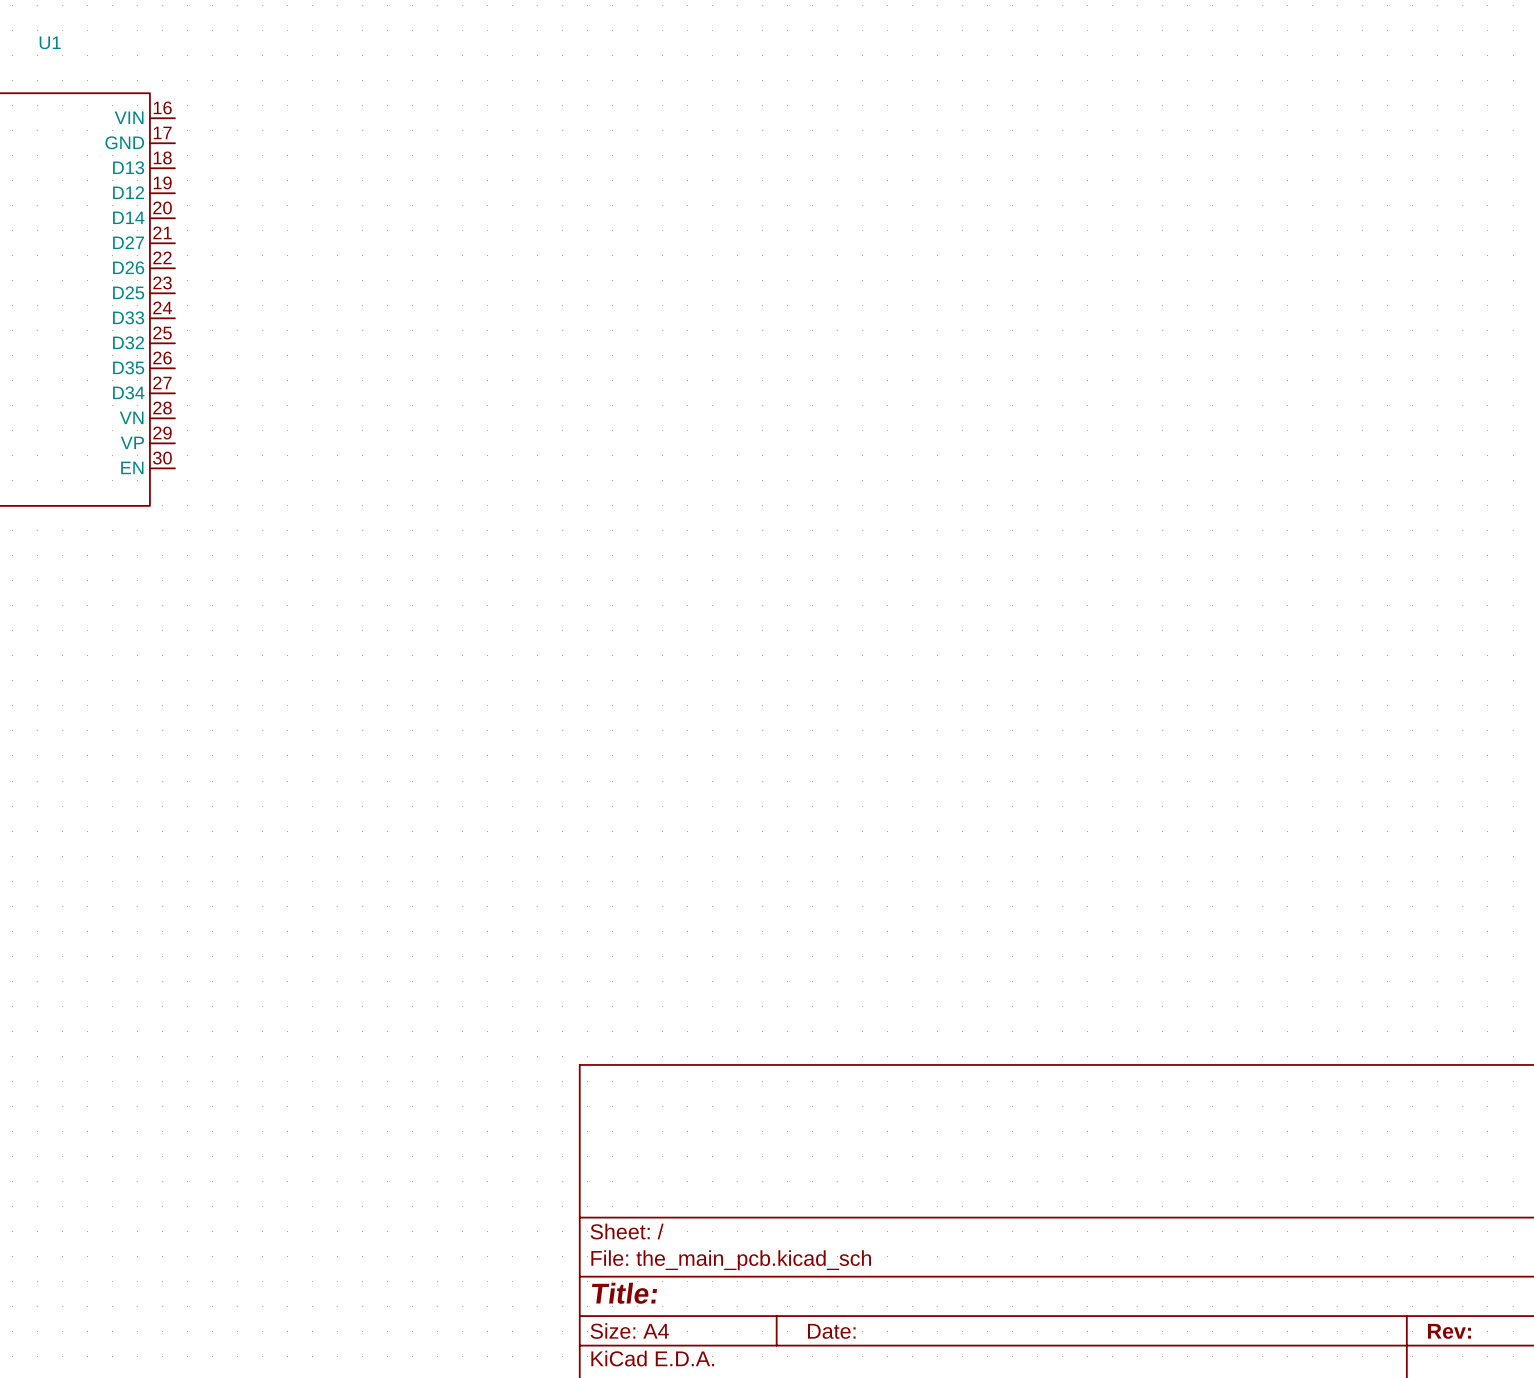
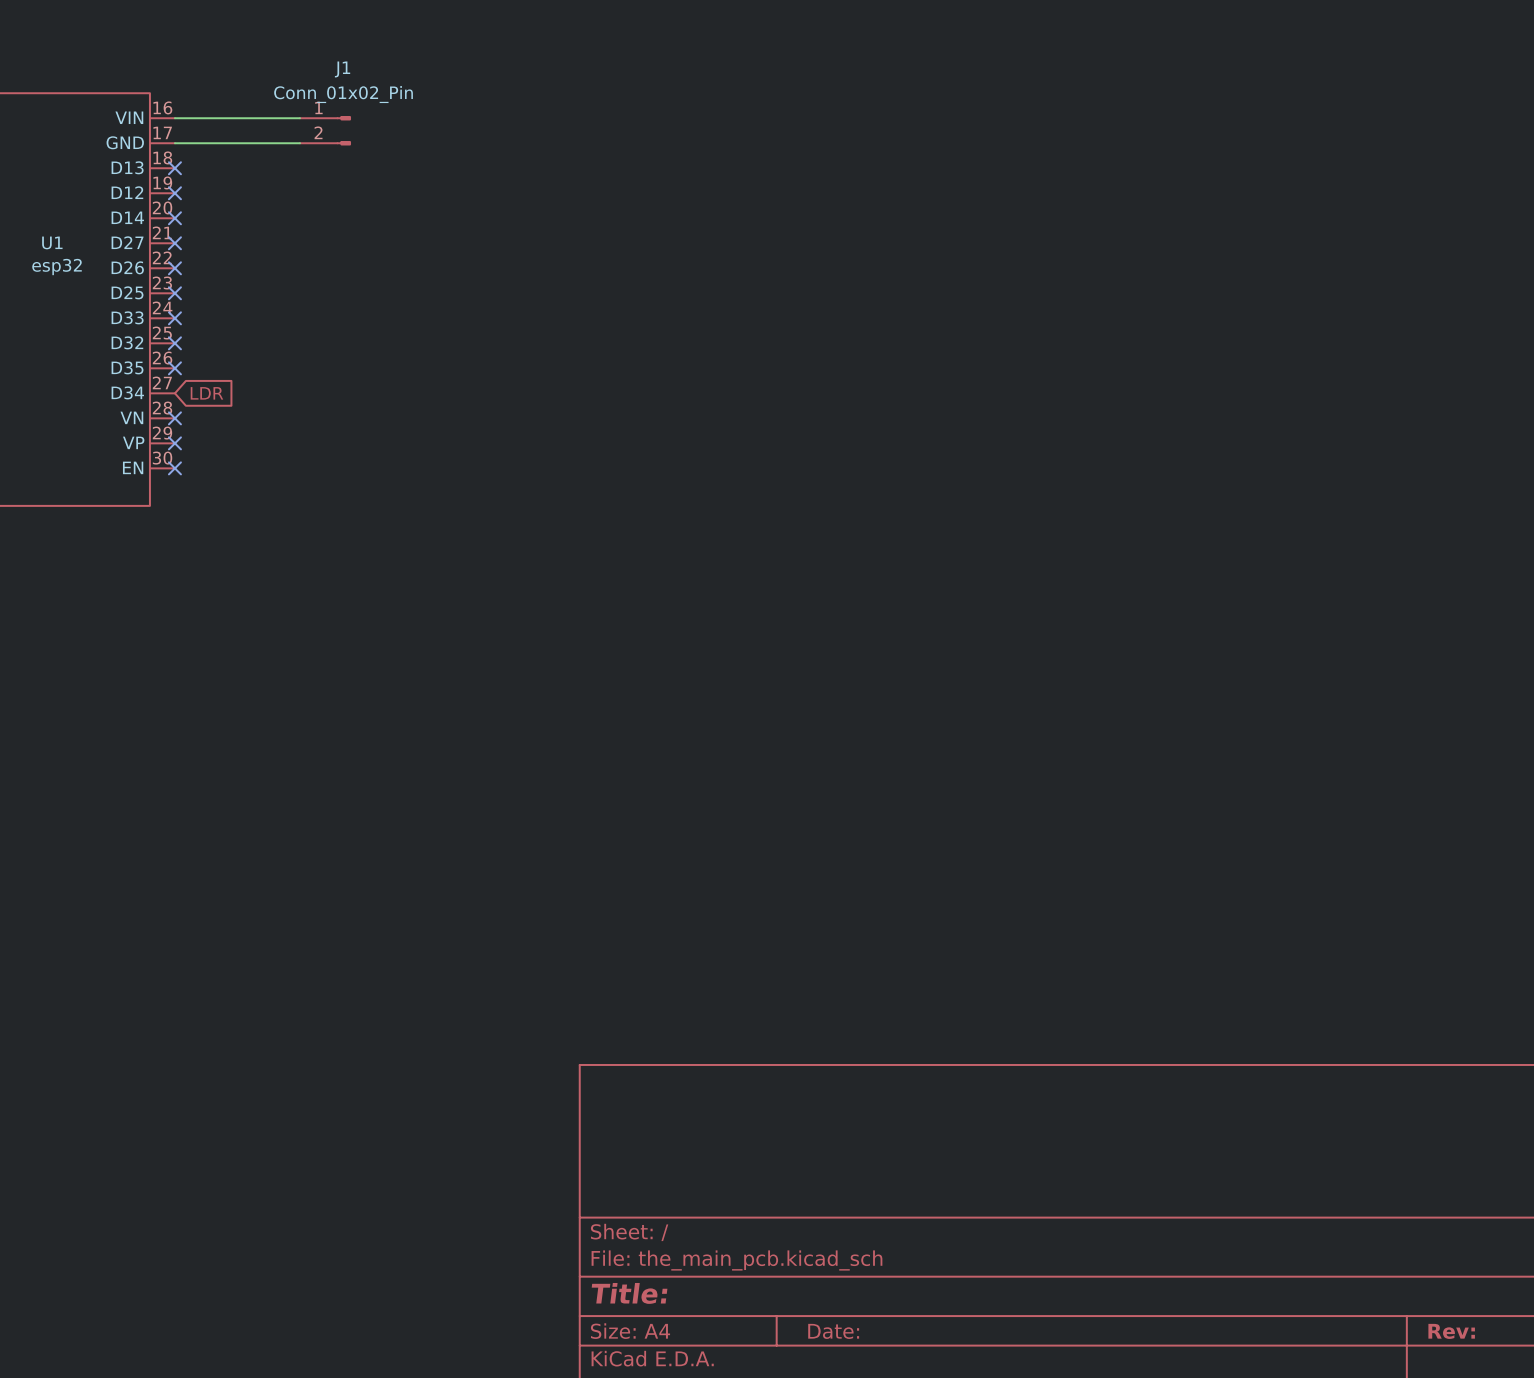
U1 name position: U1 (50, 42) -> U1 (52, 242)
wire: none -> (174, 118) (300, 118)
J1: none -> Conn_01x02_Pin (325, 130)
wire: none -> (174, 143) (300, 143)
no-connect mark: none -> (174, 168)
no-connect mark: none -> (174, 193)
no-connect mark: none -> (174, 218)
no-connect mark: none -> (174, 243)
U1 value: none -> esp32 (57, 267)
no-connect mark: none -> (174, 268)
no-connect mark: none -> (174, 293)
no-connect mark: none -> (174, 318)
no-connect mark: none -> (174, 343)
no-connect mark: none -> (174, 368)
global label: none -> LDR (206, 393)
no-connect mark: none -> (174, 418)
no-connect mark: none -> (174, 443)
no-connect mark: none -> (174, 468)

